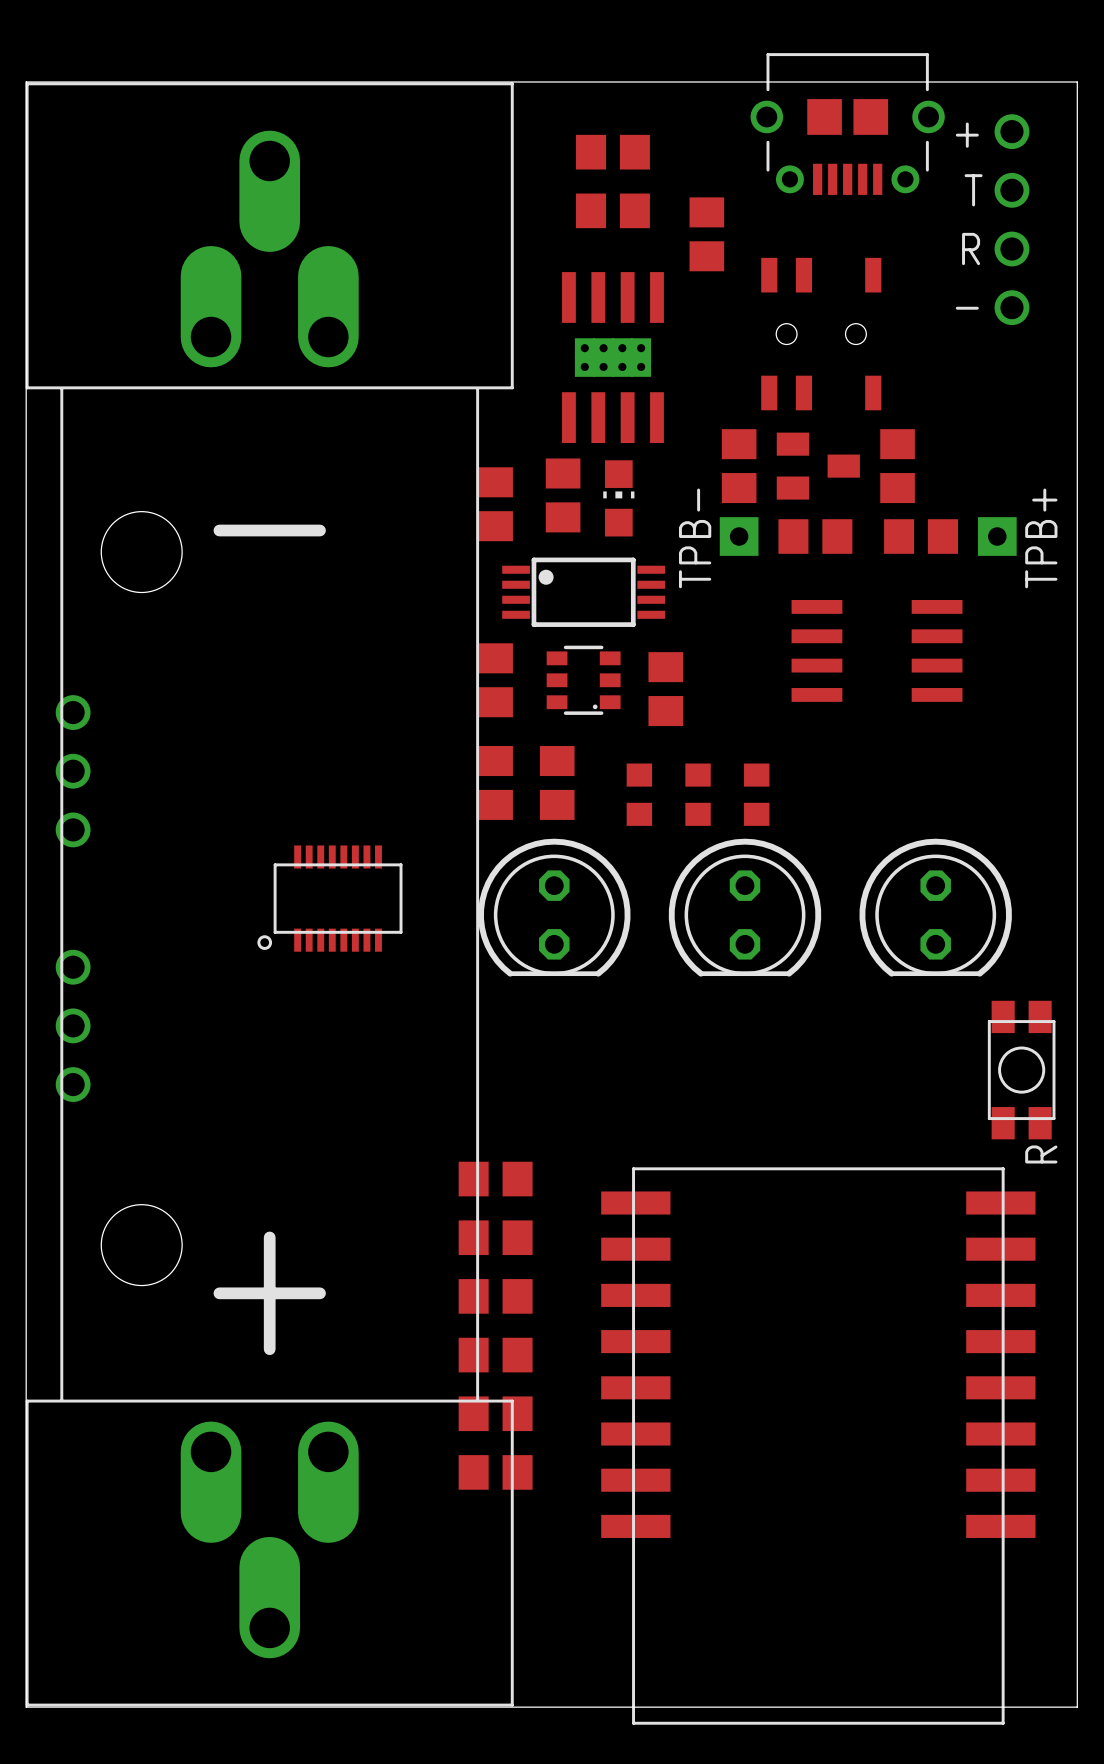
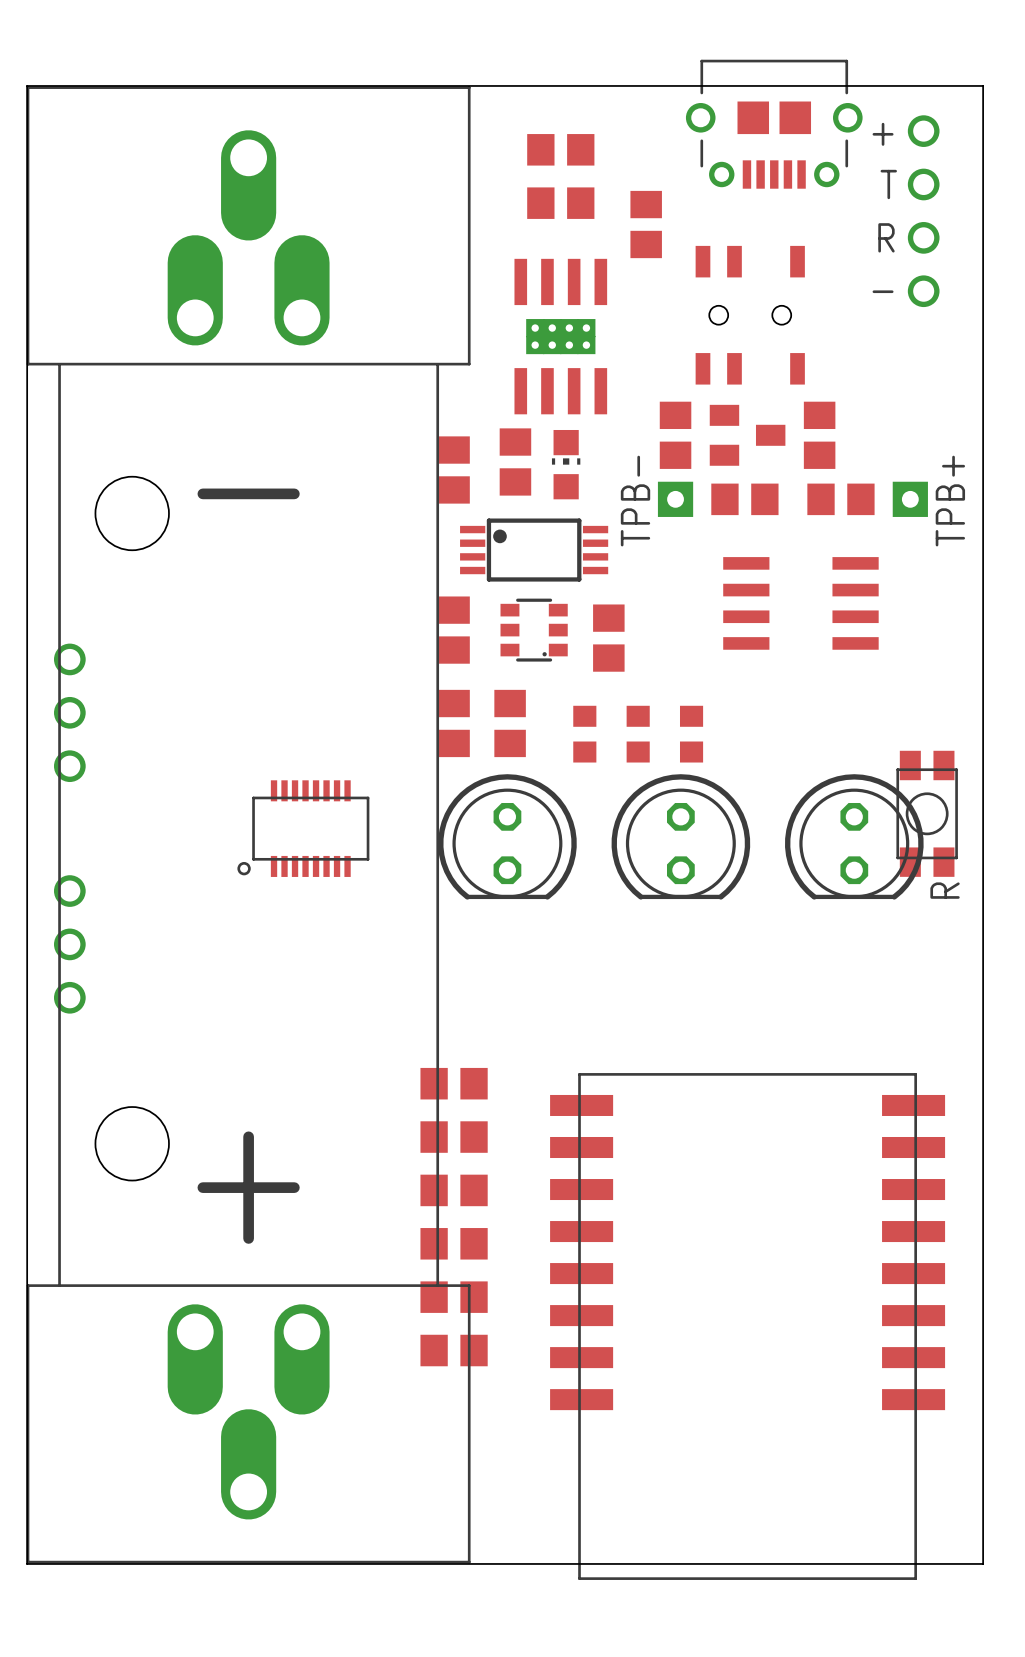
R position: (1021, 1070) -> (927, 813)

